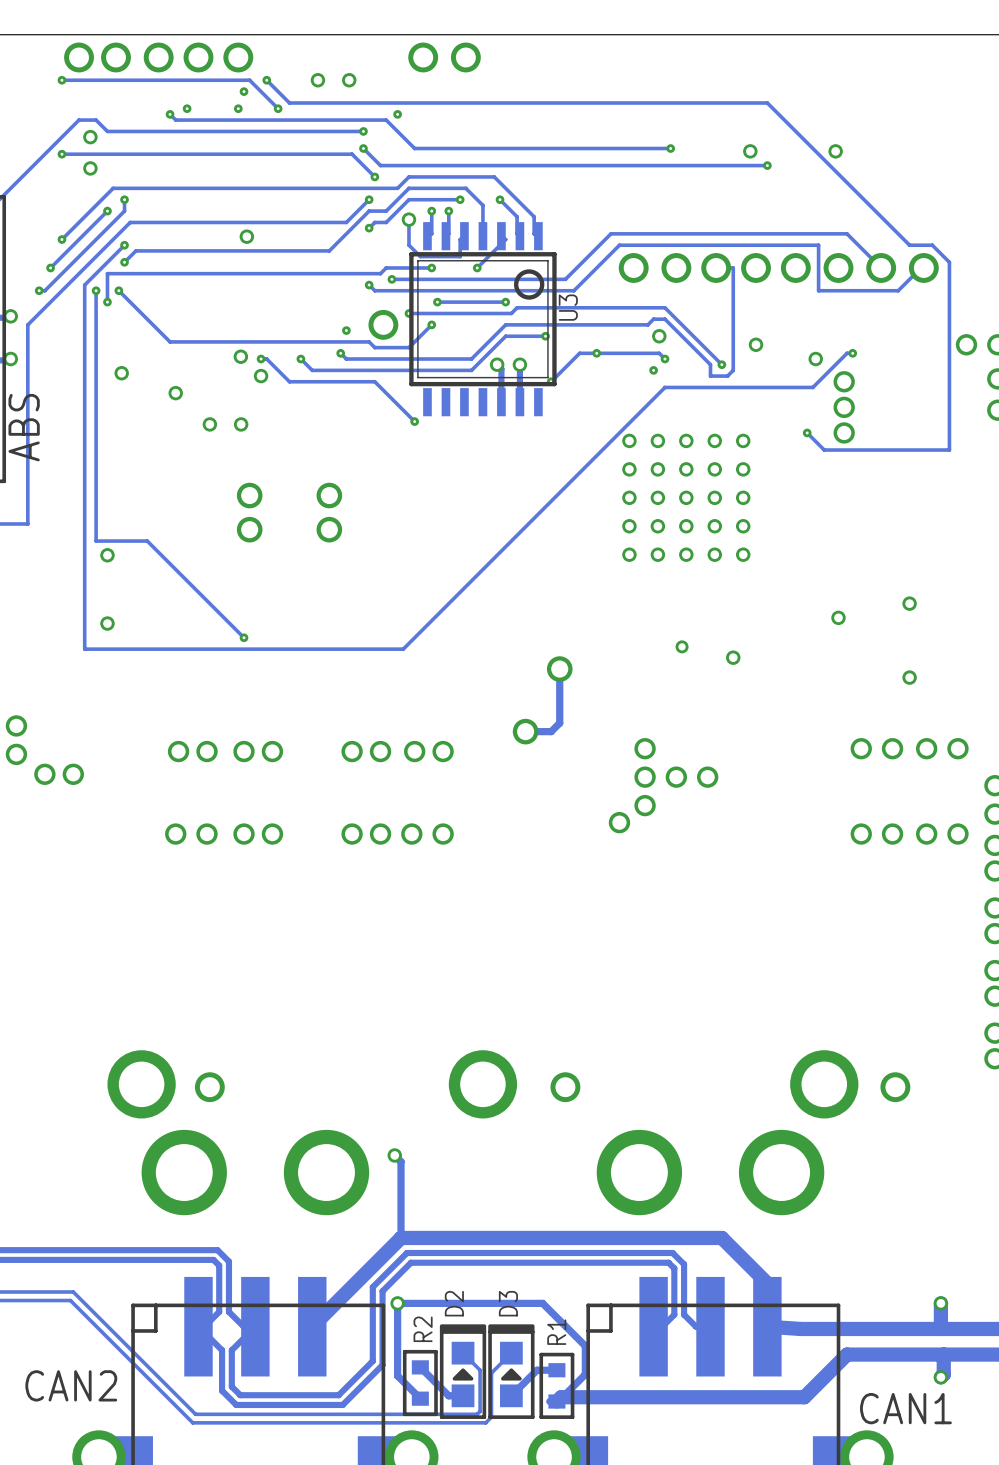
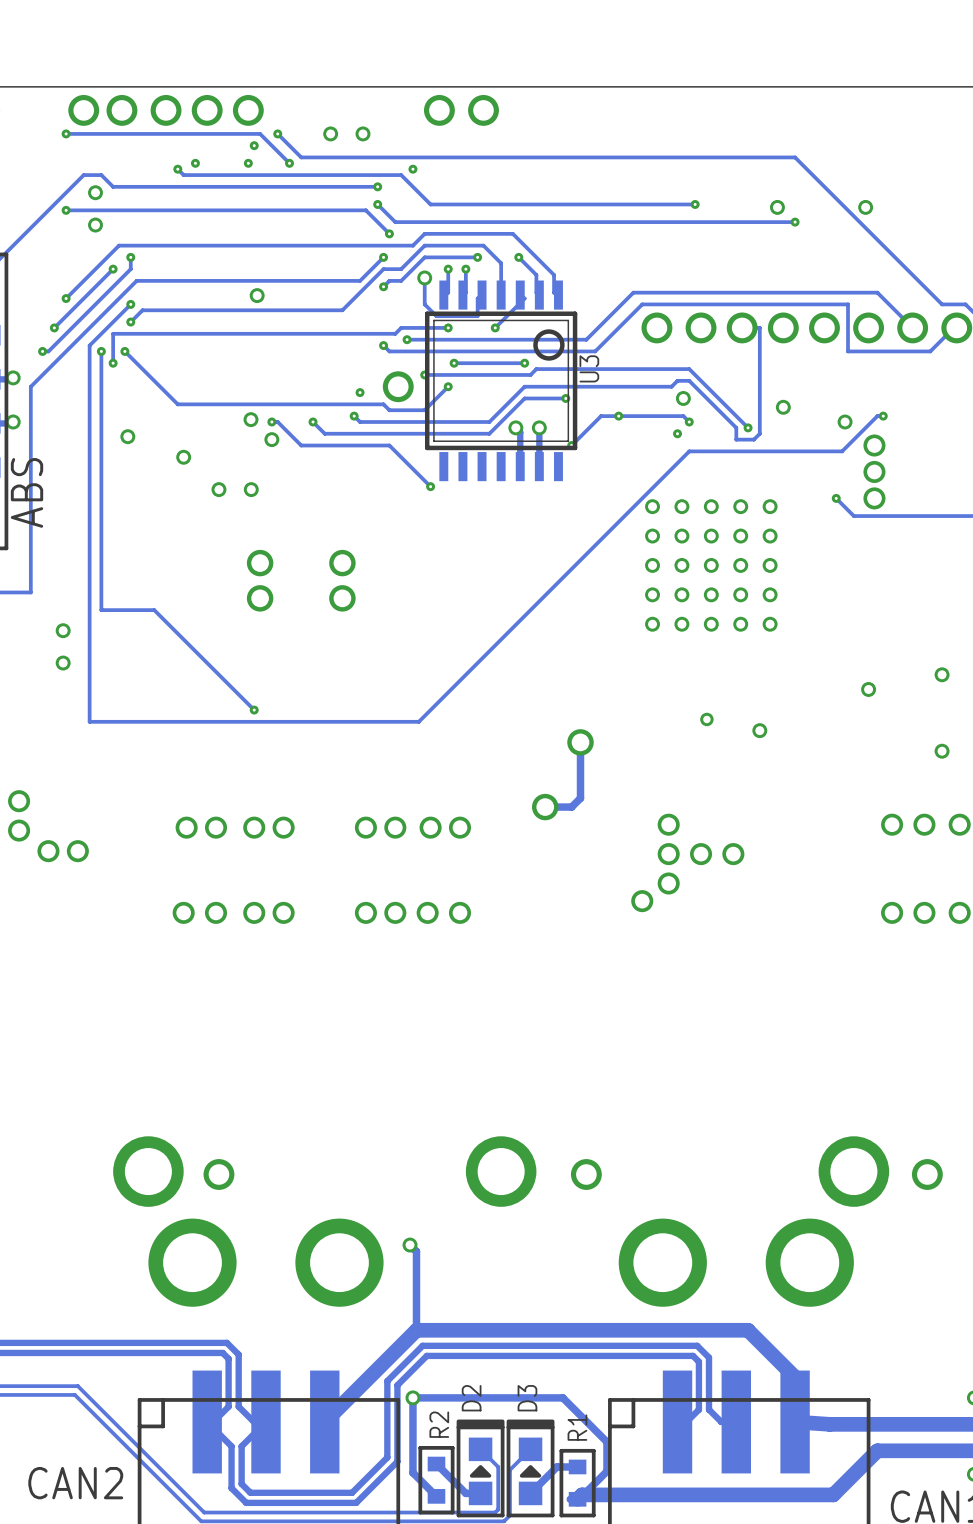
via: (107, 555) -> none
via: none -> (63, 630)
via: none -> (63, 663)
via: (107, 623) -> none

